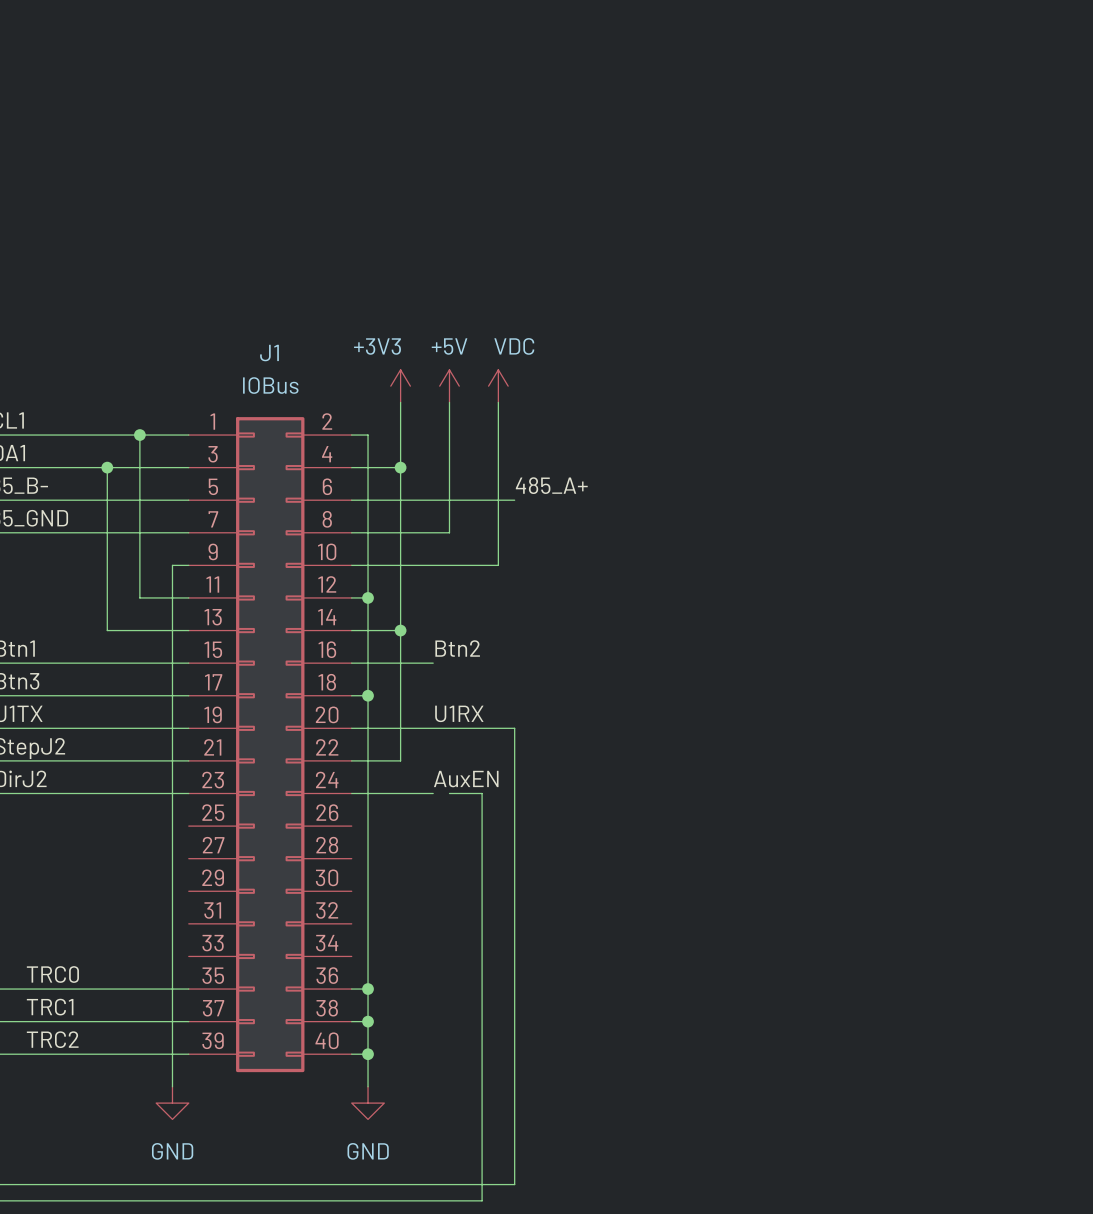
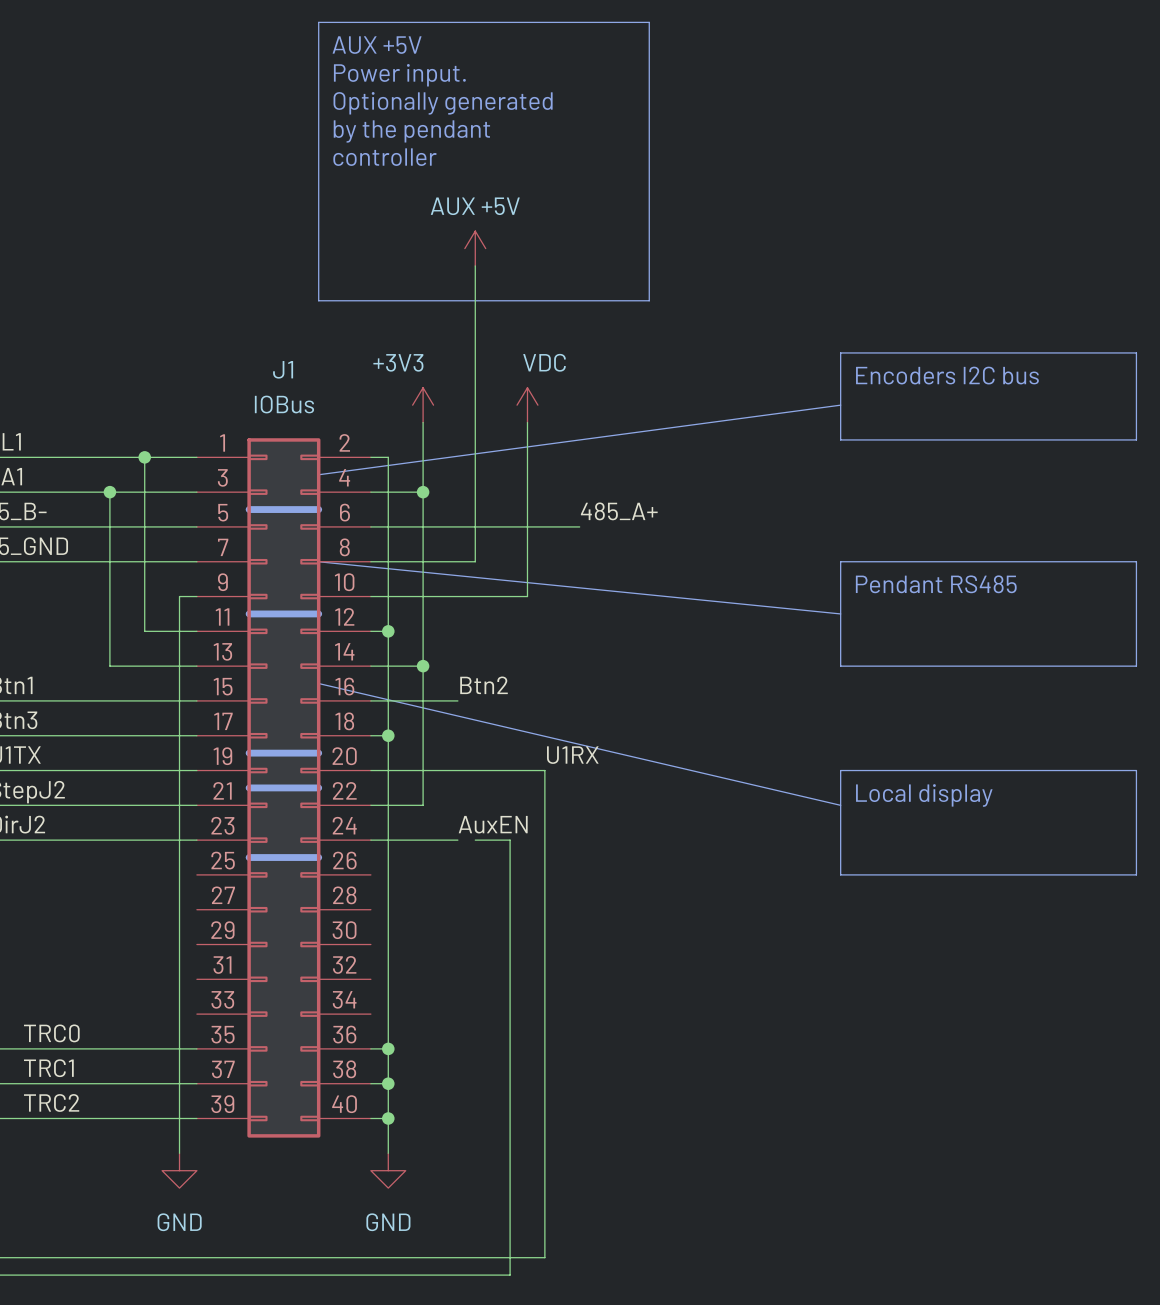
line: none -> (318, 22) (649, 22) (649, 300) (318, 300) (318, 22)
text: none -> AUX +5V (377, 45)
text: none -> Power input. (399, 75)
text: none -> Optionally generated (443, 103)
text: none -> by the pendant (411, 131)
text: none -> controller (384, 157)
power symbol: none -> AUX +5V (475, 248)
wire: none -> (475, 265) (475, 422)
line: none -> (840, 352) (1136, 352) (1136, 439) (840, 439) (840, 352)
text: none -> Encoders I2C bus (947, 375)
power symbol: +5V (449, 386) -> none
line: none -> (840, 405) (318, 474)
line: none -> (249, 509) (318, 509)
label position: 485_A+ (551, 485) -> 485_A+ (619, 511)
wire: none -> (544, 526) (579, 526)
line: none -> (318, 561) (840, 613)
line: none -> (840, 561) (840, 666) (1136, 666) (1136, 561) (840, 561)
text: none -> Pendant RS485 (936, 584)
line: none -> (249, 613) (318, 613)
line: none -> (318, 683) (840, 805)
line: none -> (249, 753) (318, 753)
label position: U1RX (459, 713) -> U1RX (572, 755)
line: none -> (840, 770) (840, 874) (1136, 874) (1136, 770) (840, 770)
line: none -> (249, 787) (318, 787)
text: none -> Local display (924, 795)
line: none -> (249, 857) (318, 857)

